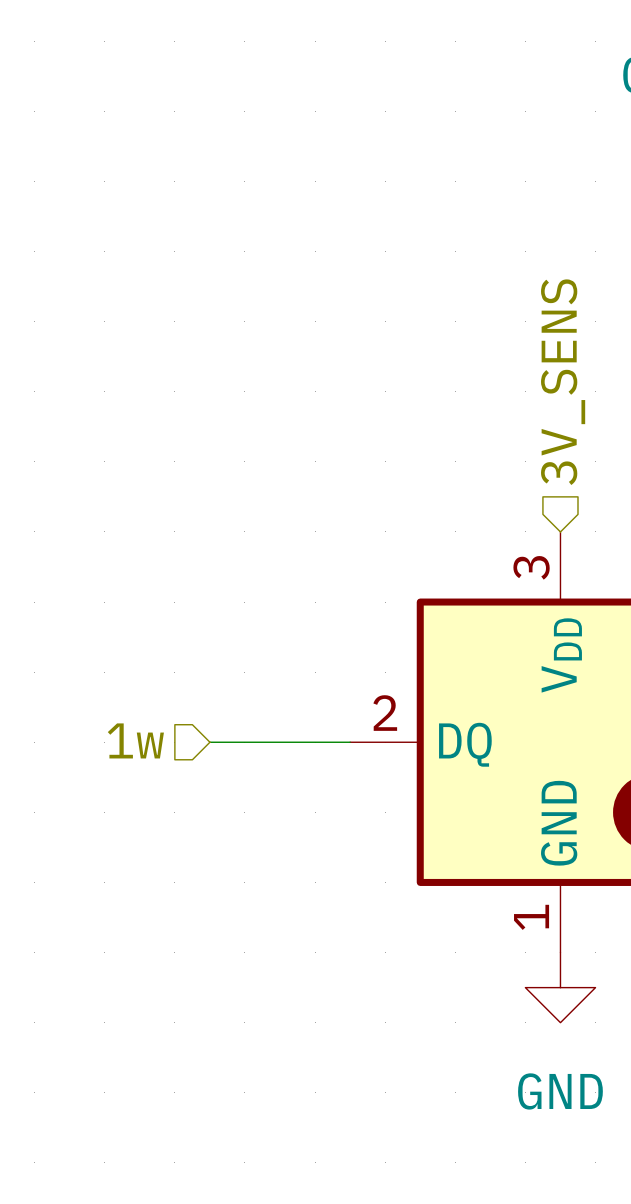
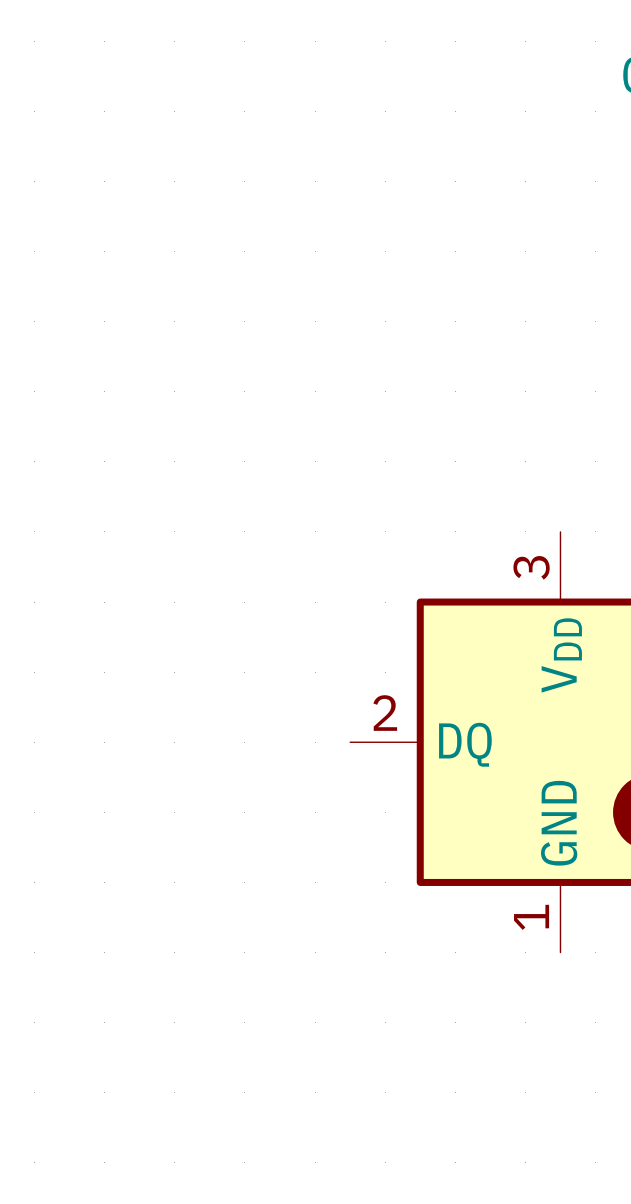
hierarchical label: 3V_SENS (563, 382) -> none
hierarchical label: 1w (135, 740) -> none
wire: (209, 742) (350, 742) -> none
power symbol: GND (560, 987) -> none

